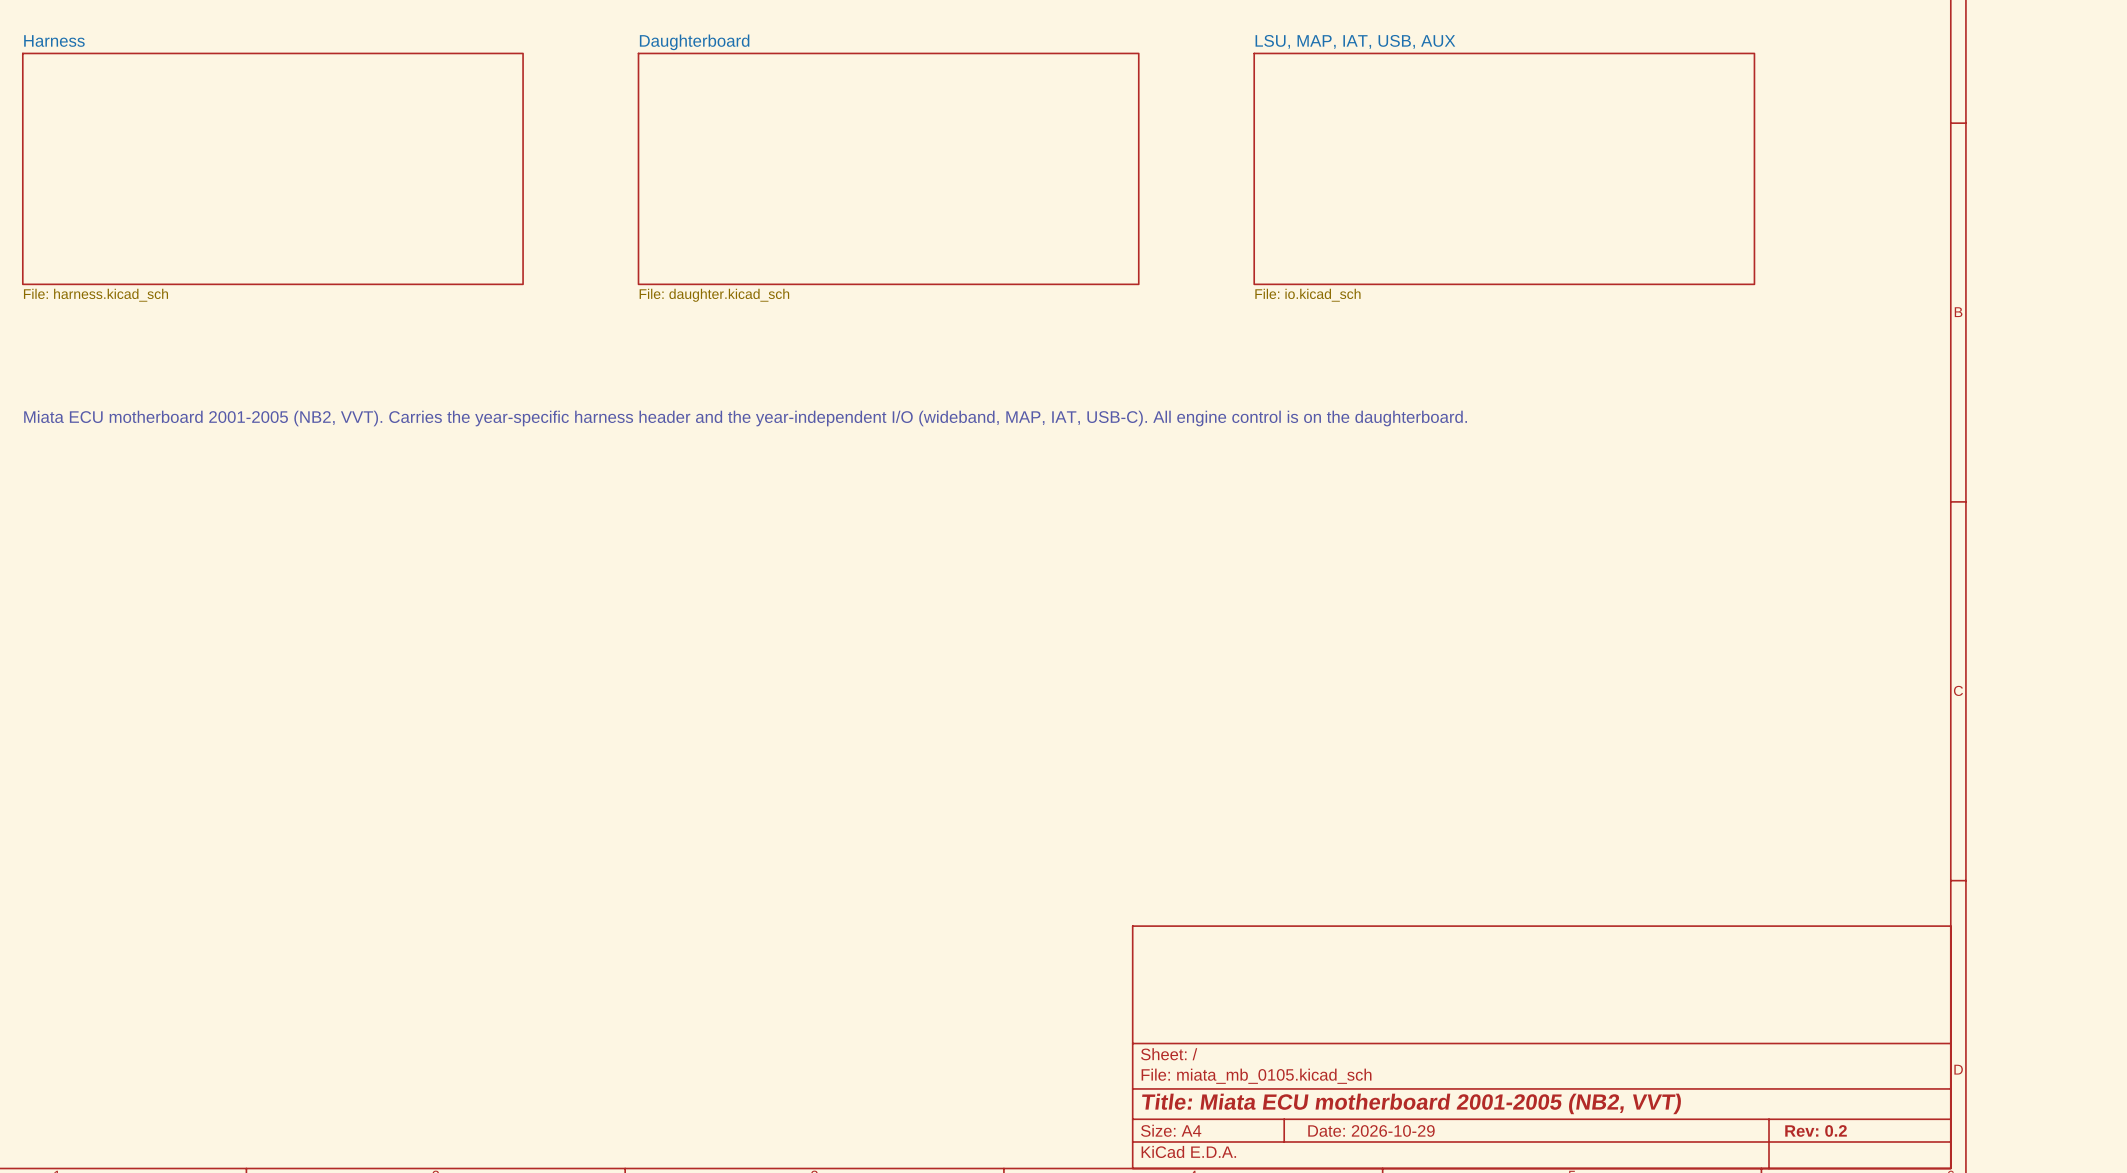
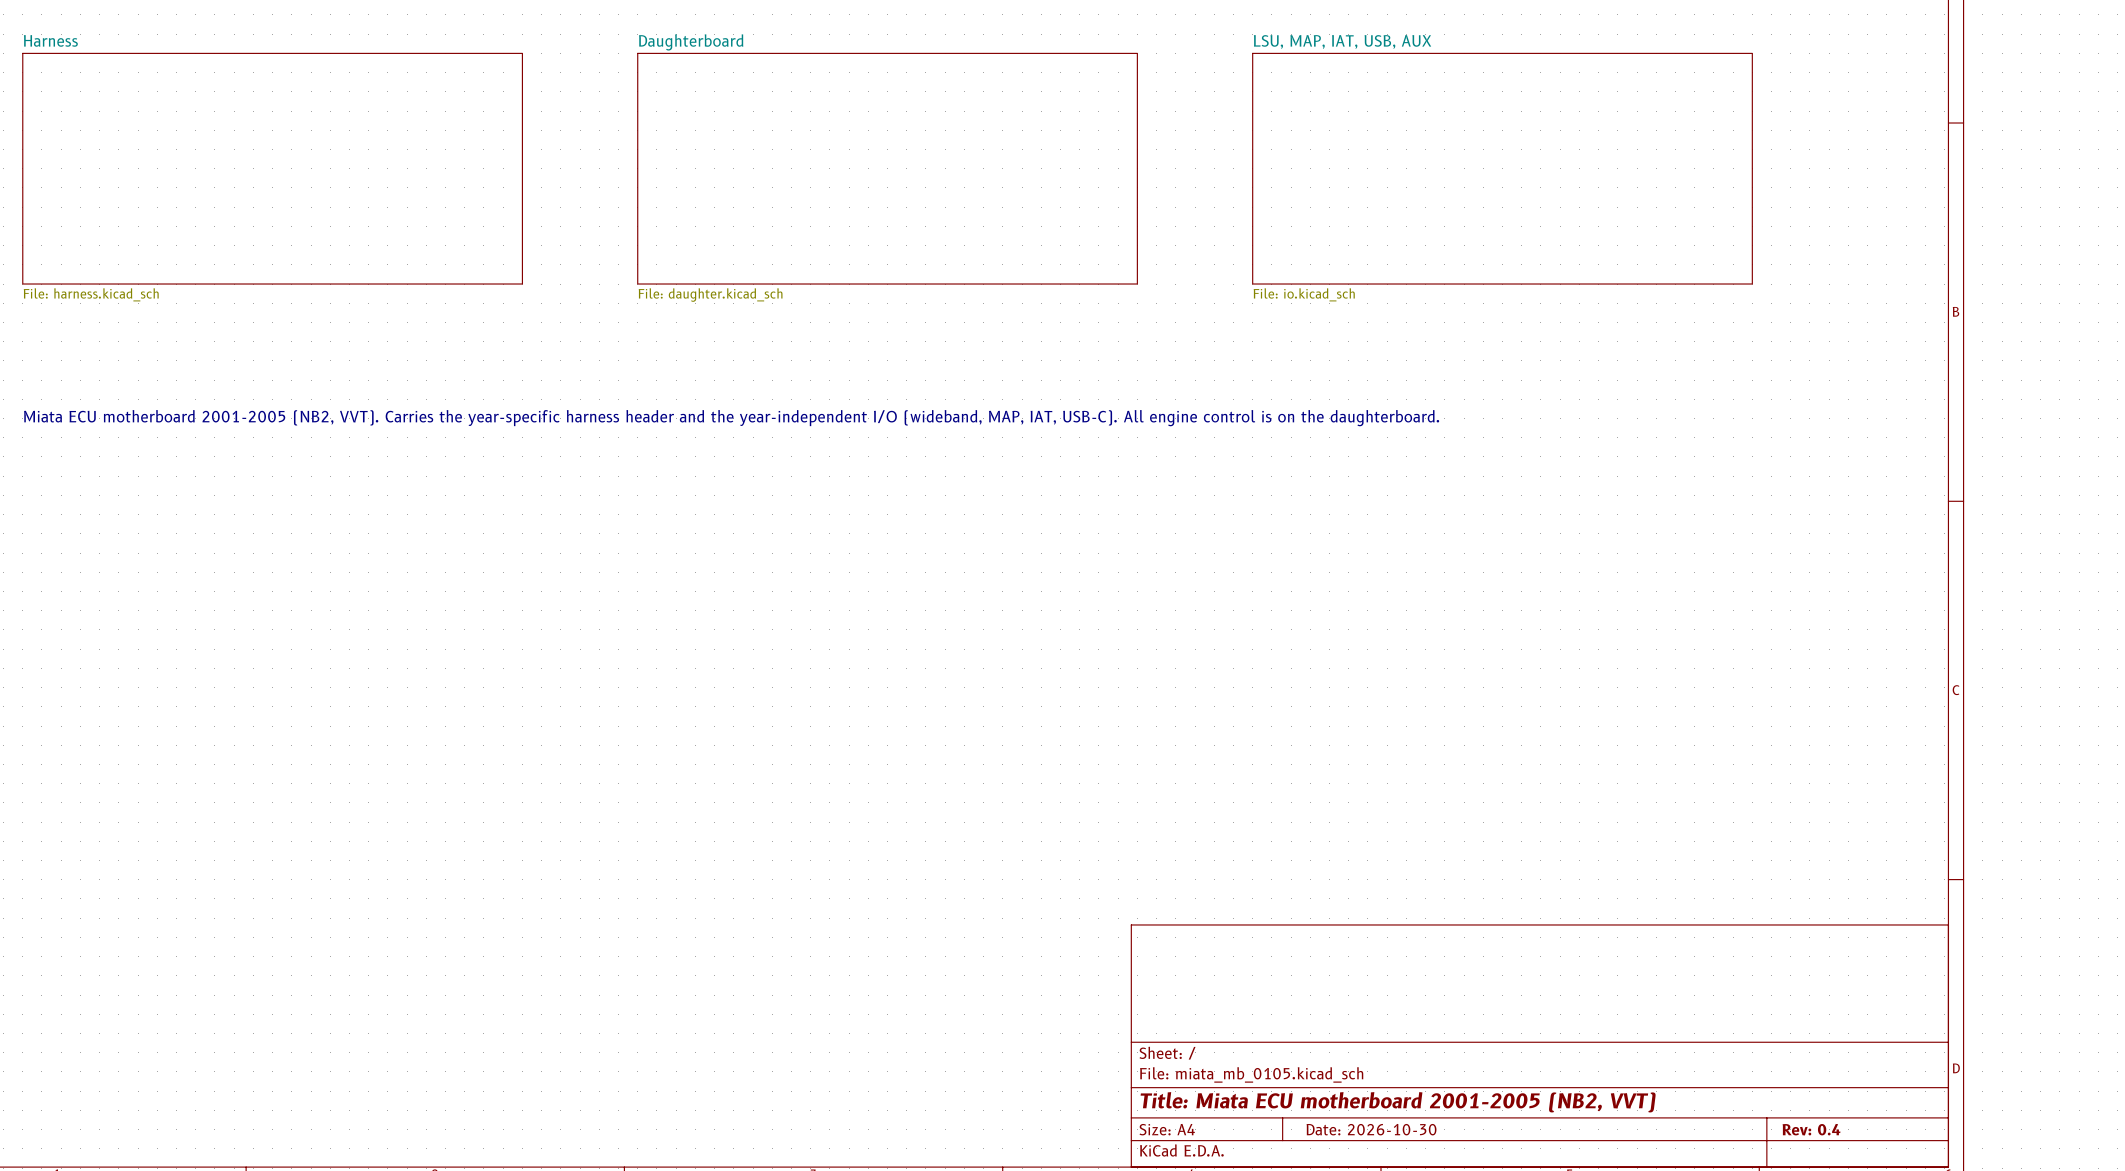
title block: Date: 2026-10-29 (1371, 1130) -> Date: 2026-10-30 (1371, 1129)
title block: Rev: 0.2 (1816, 1130) -> Rev: 0.4 (1811, 1129)

